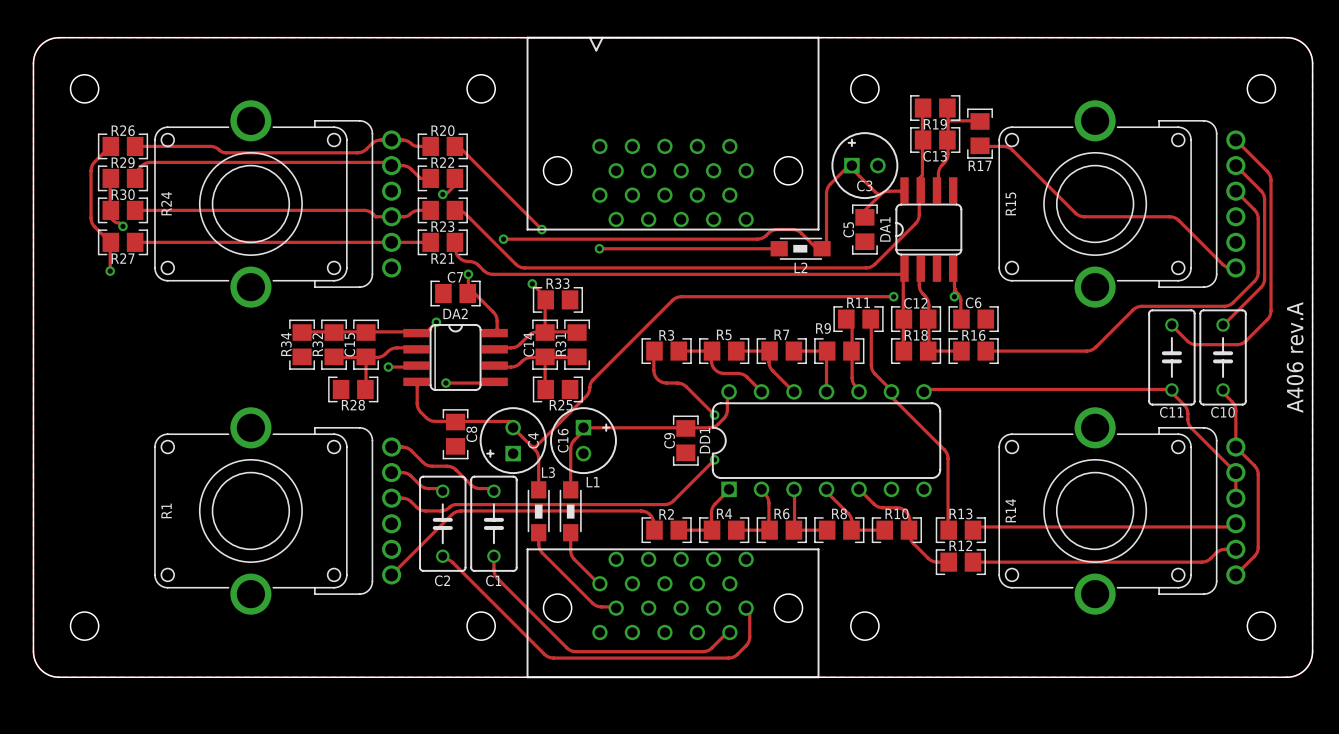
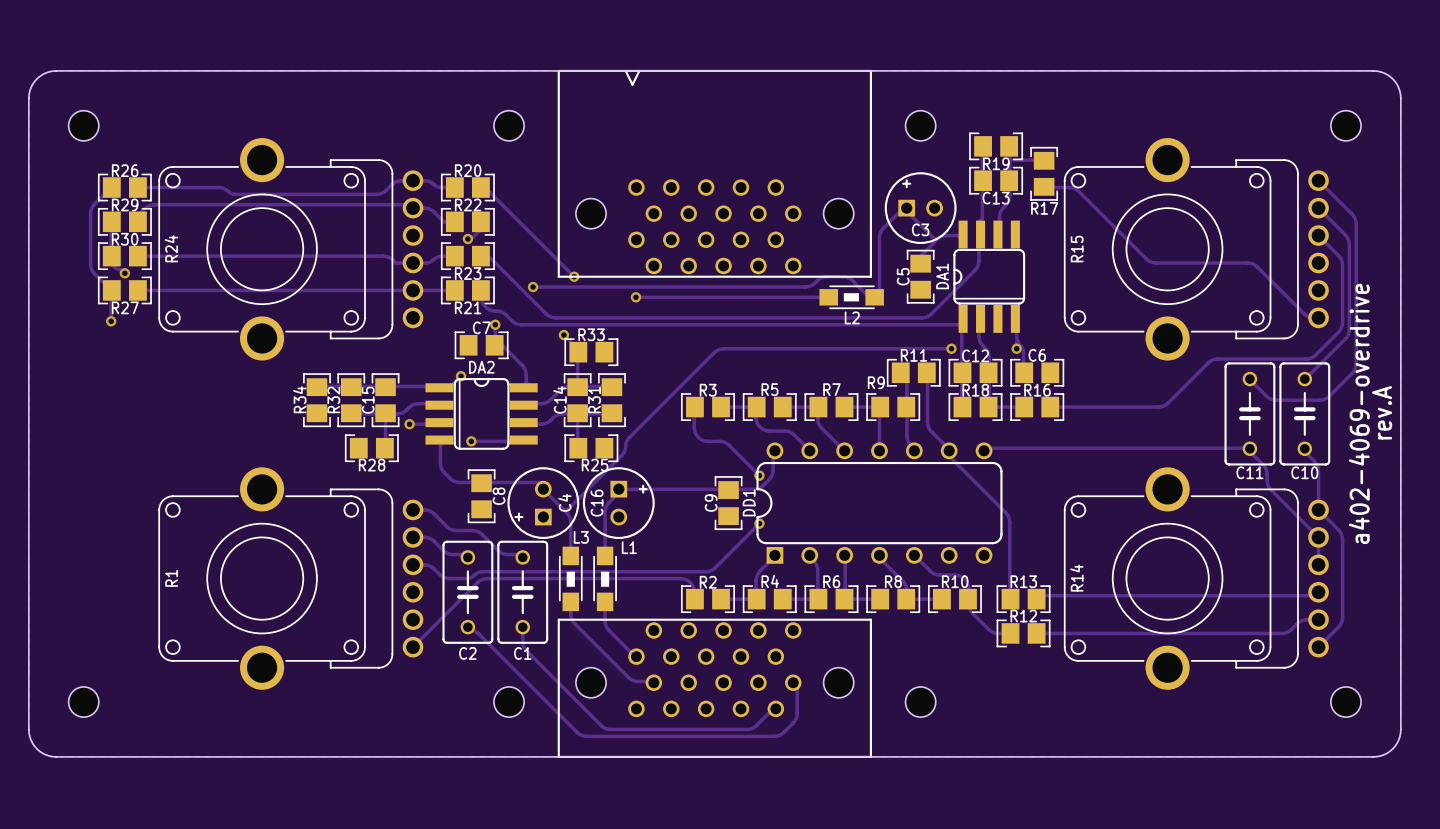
part text: none -> a402-4069-overdrive (1359, 413)
part value: A406 rev.A (1295, 357) -> rev.A (1382, 412)

